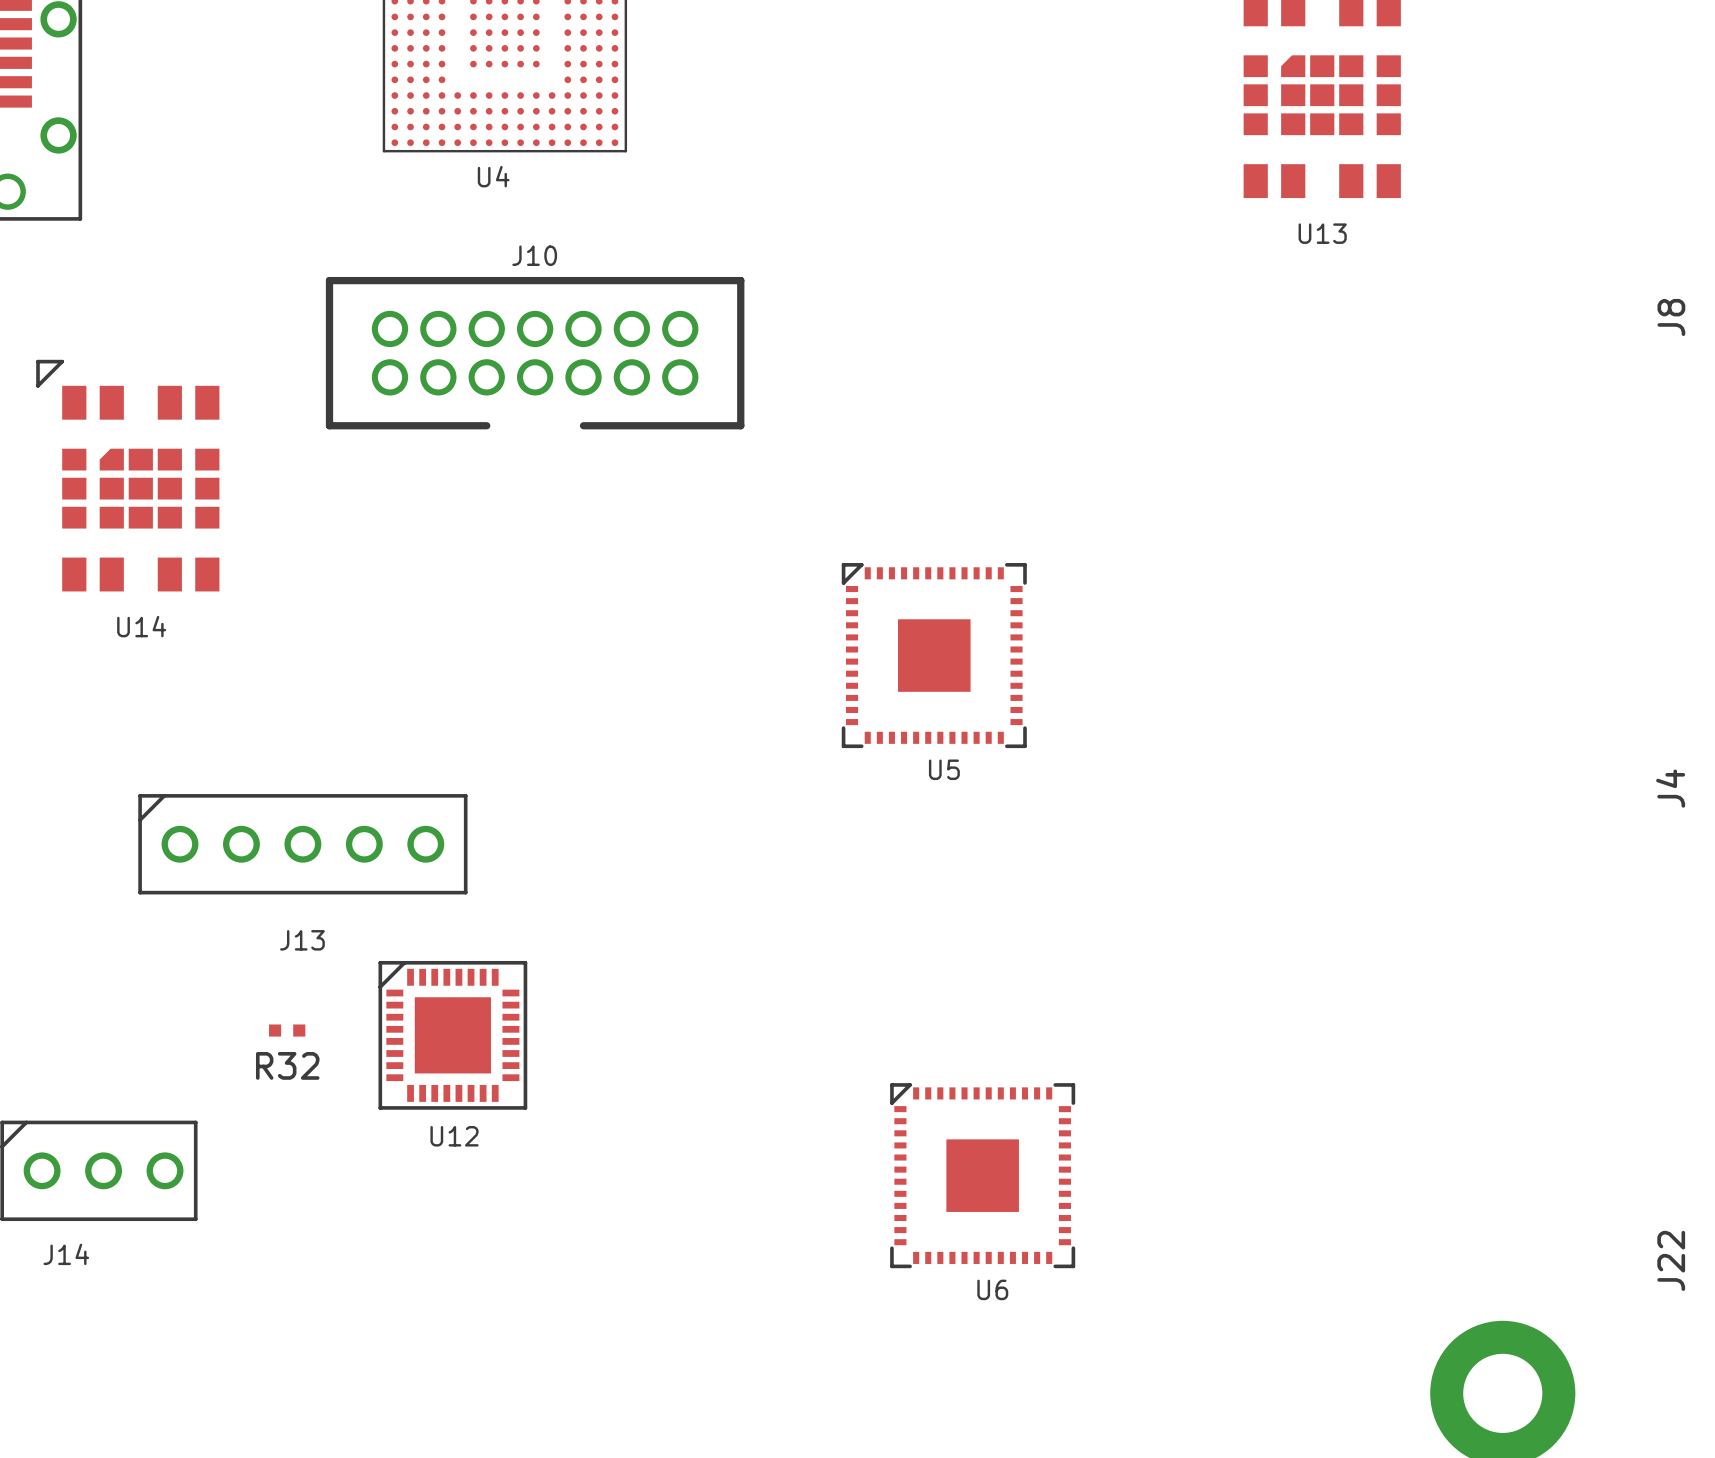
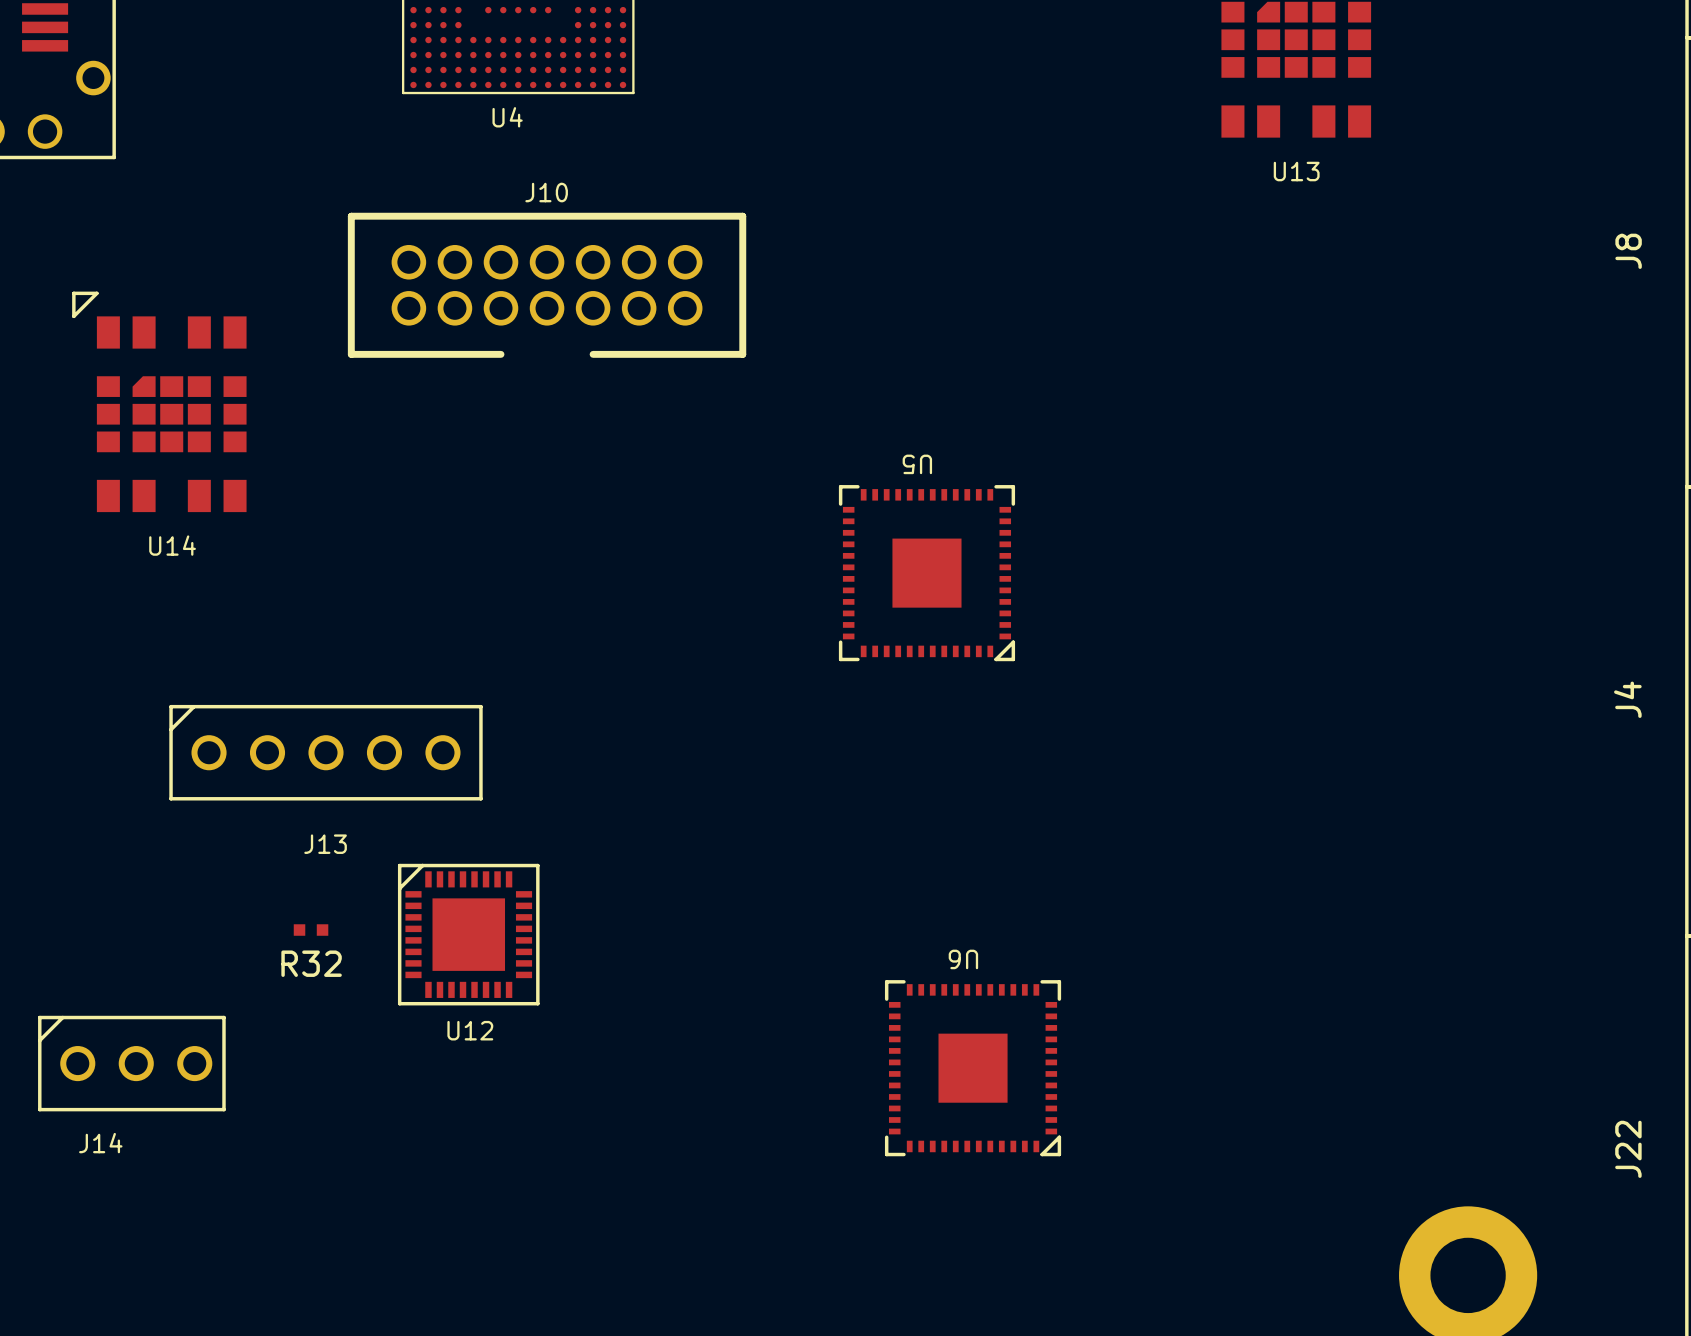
U5 rotation: 0° (934, 655) -> 180° (926, 573)
U6 rotation: 0° (982, 1175) -> 180° (973, 1068)

